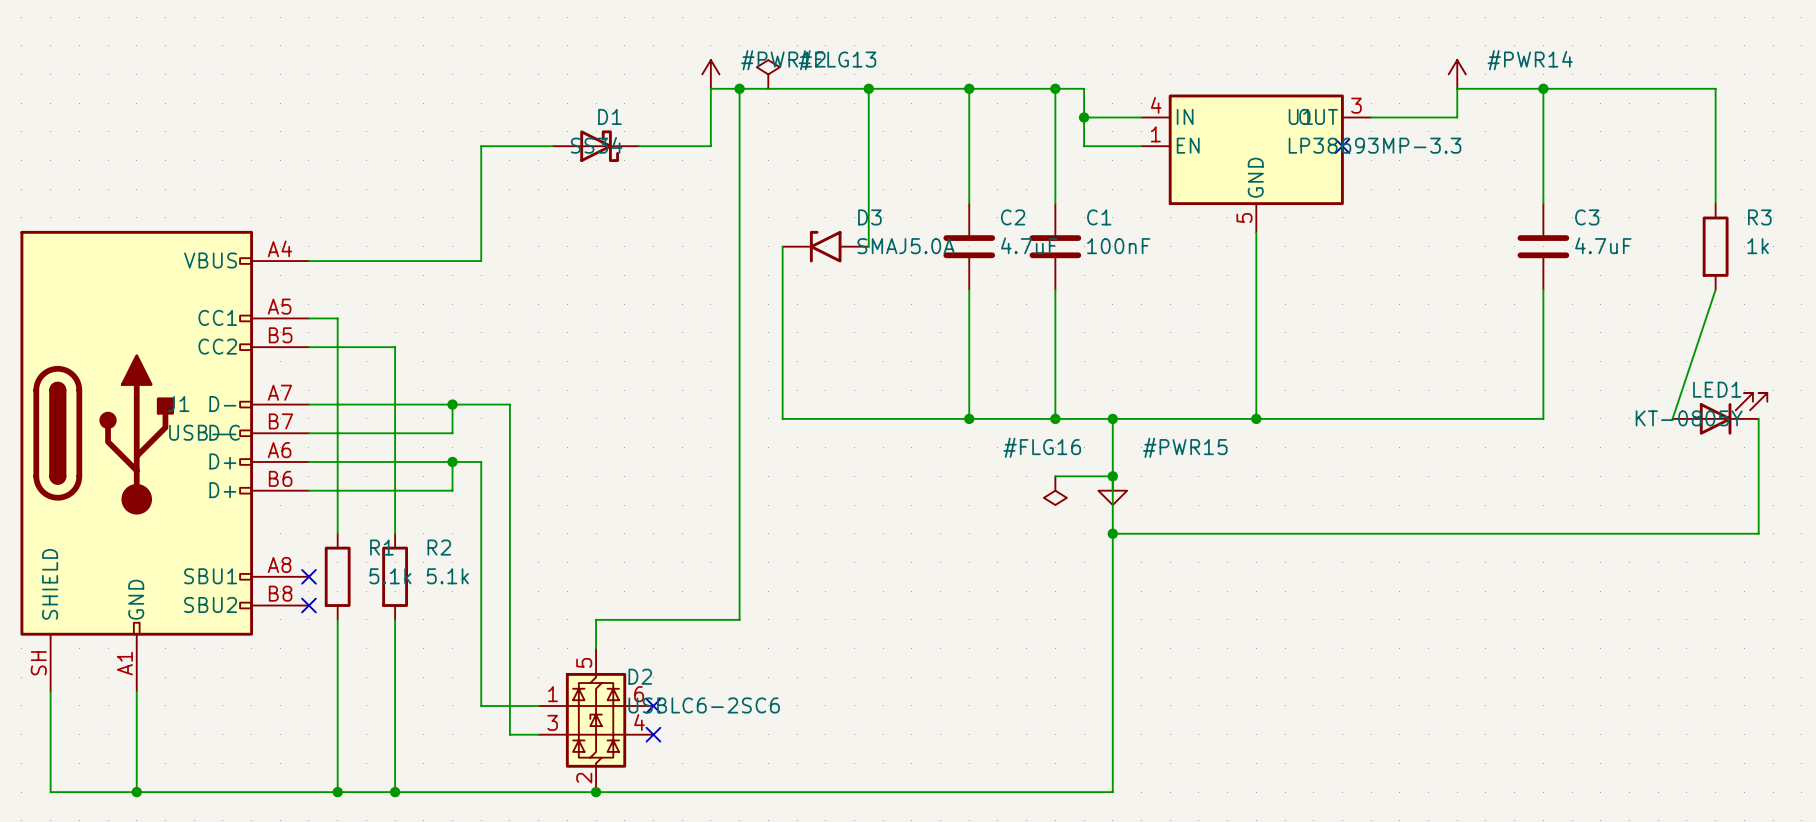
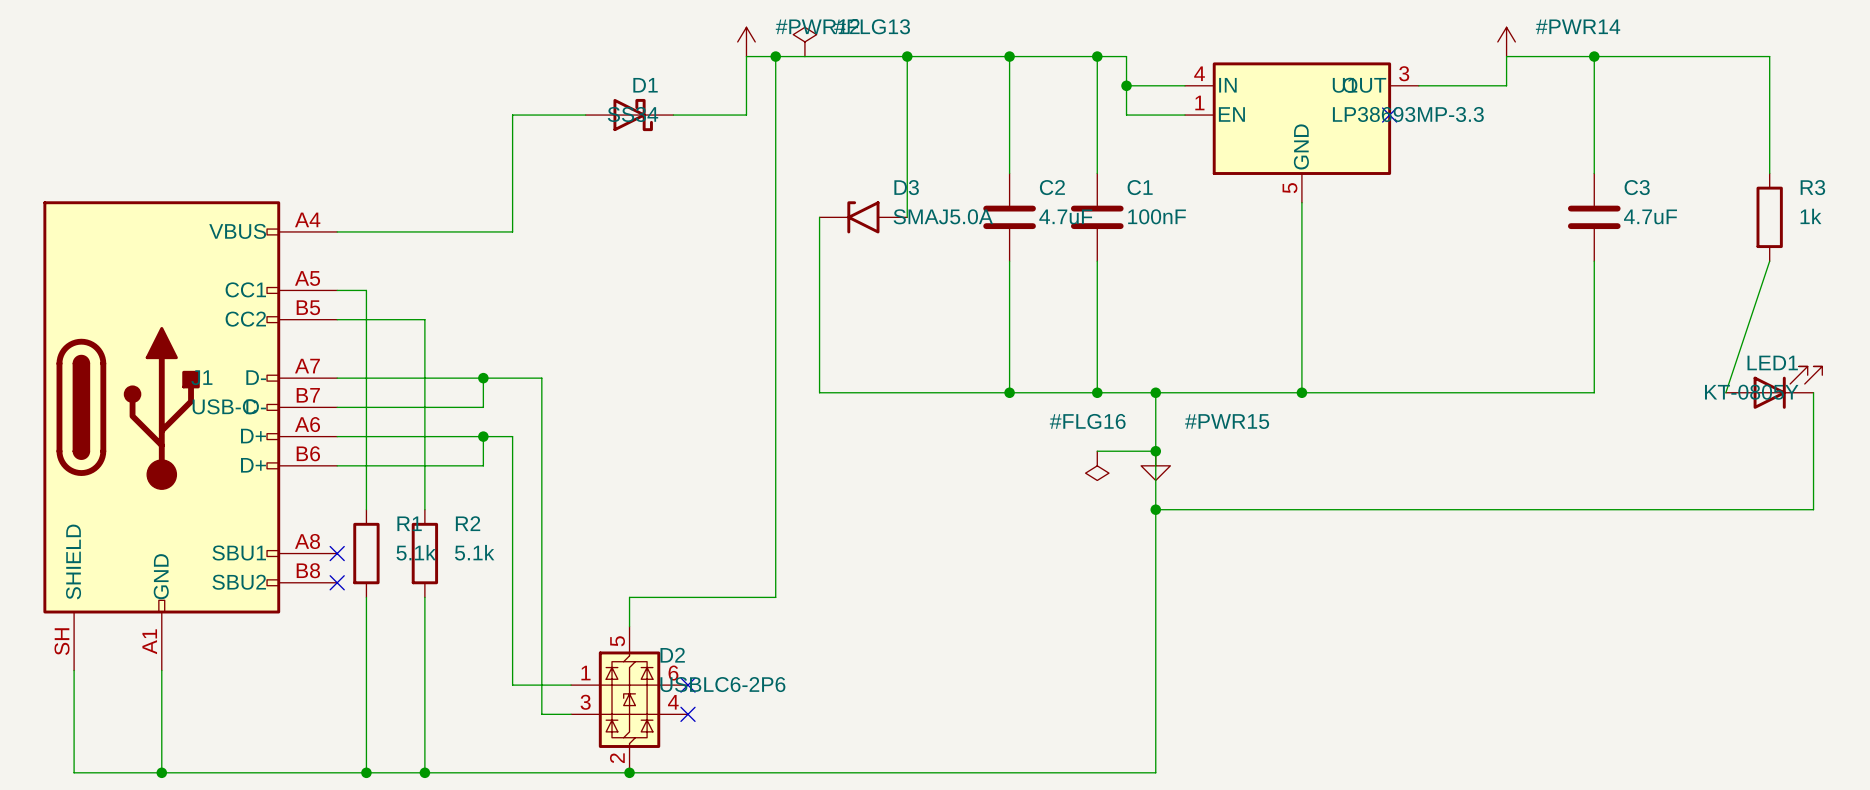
D2 value: USBLC6-2SC6 (704, 705) -> USBLC6-2P6 (722, 684)

